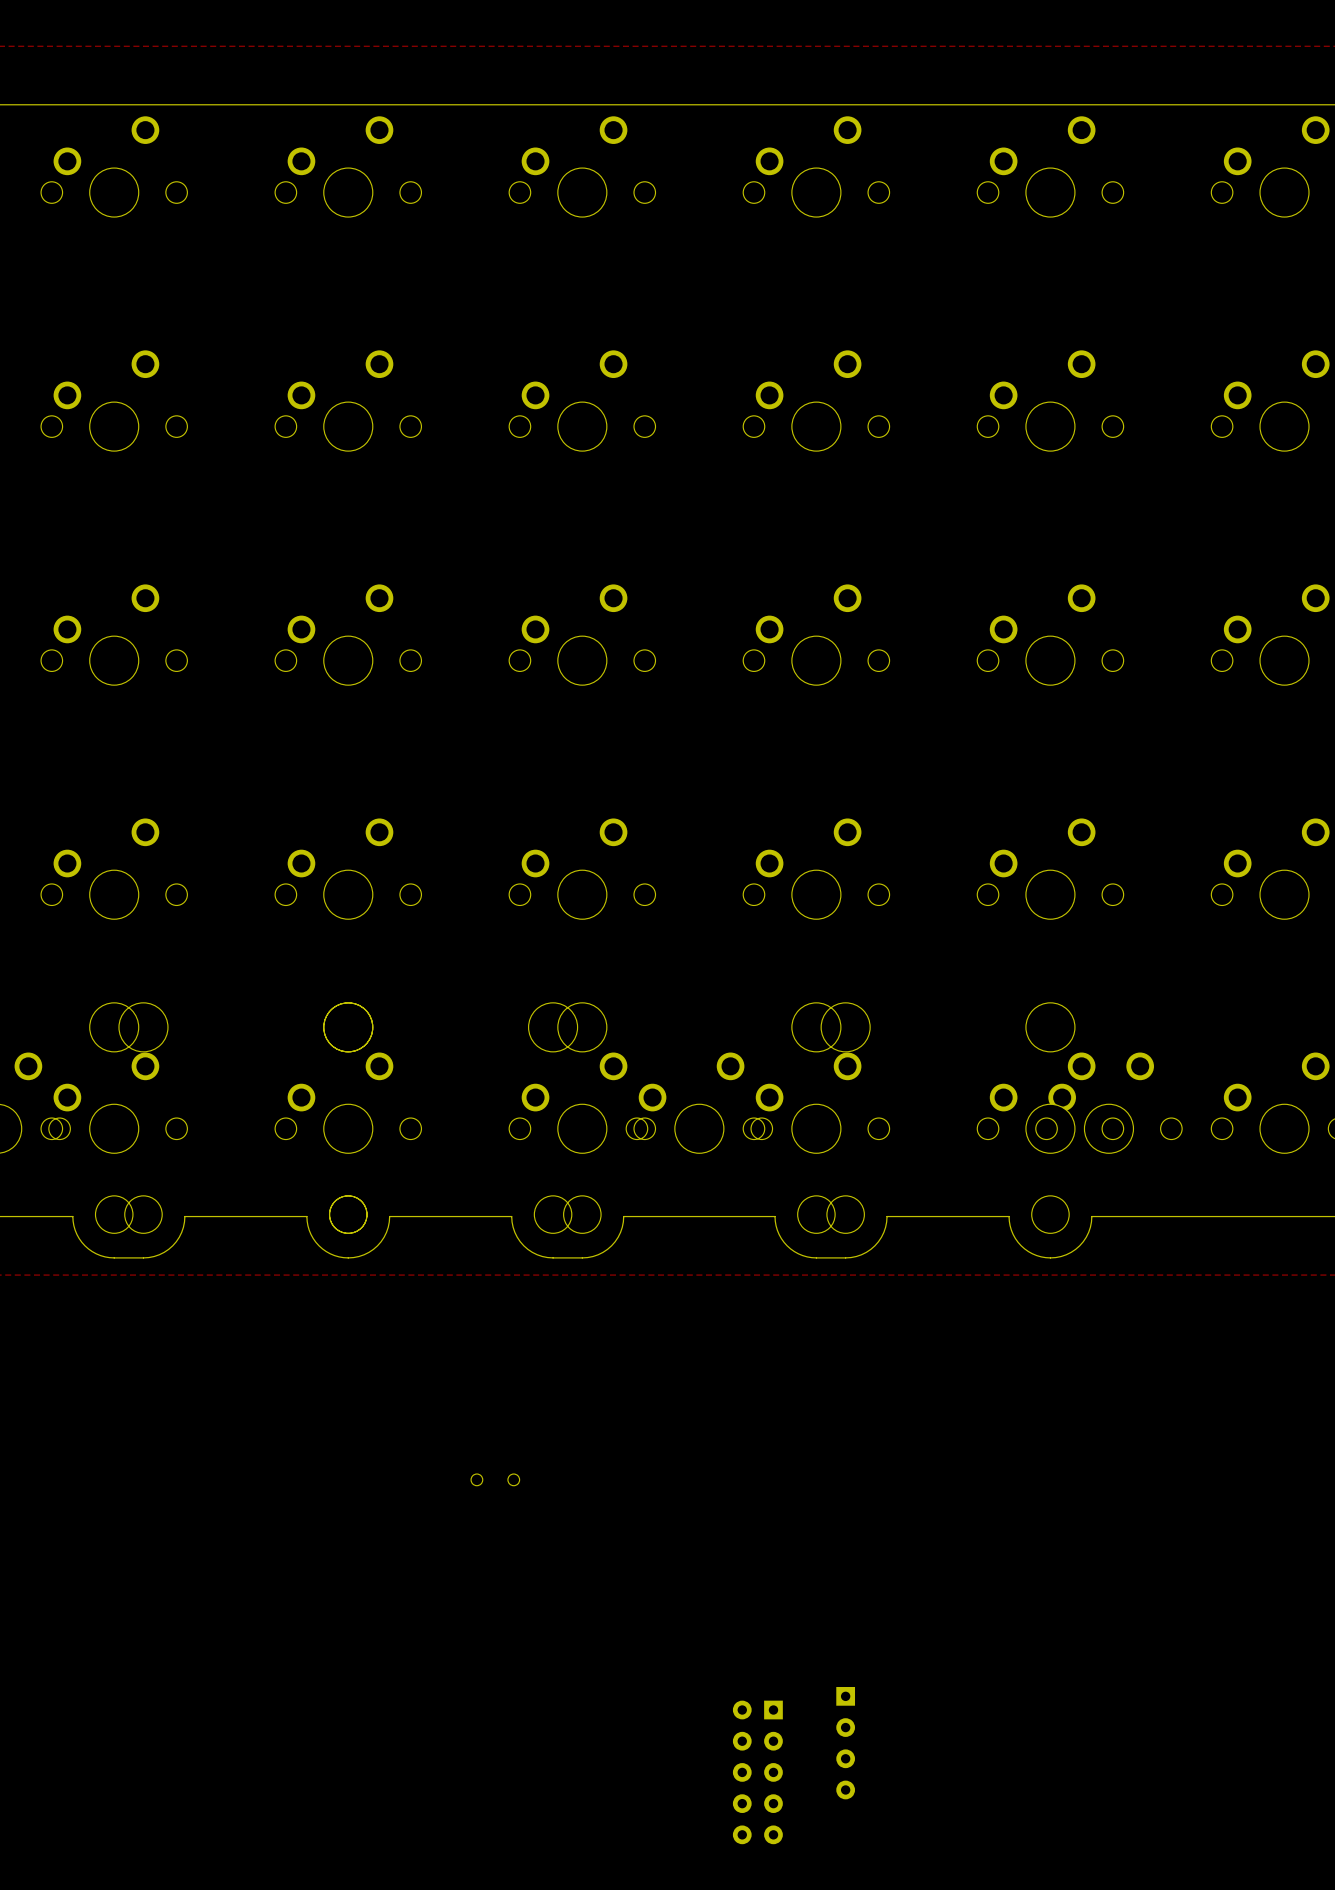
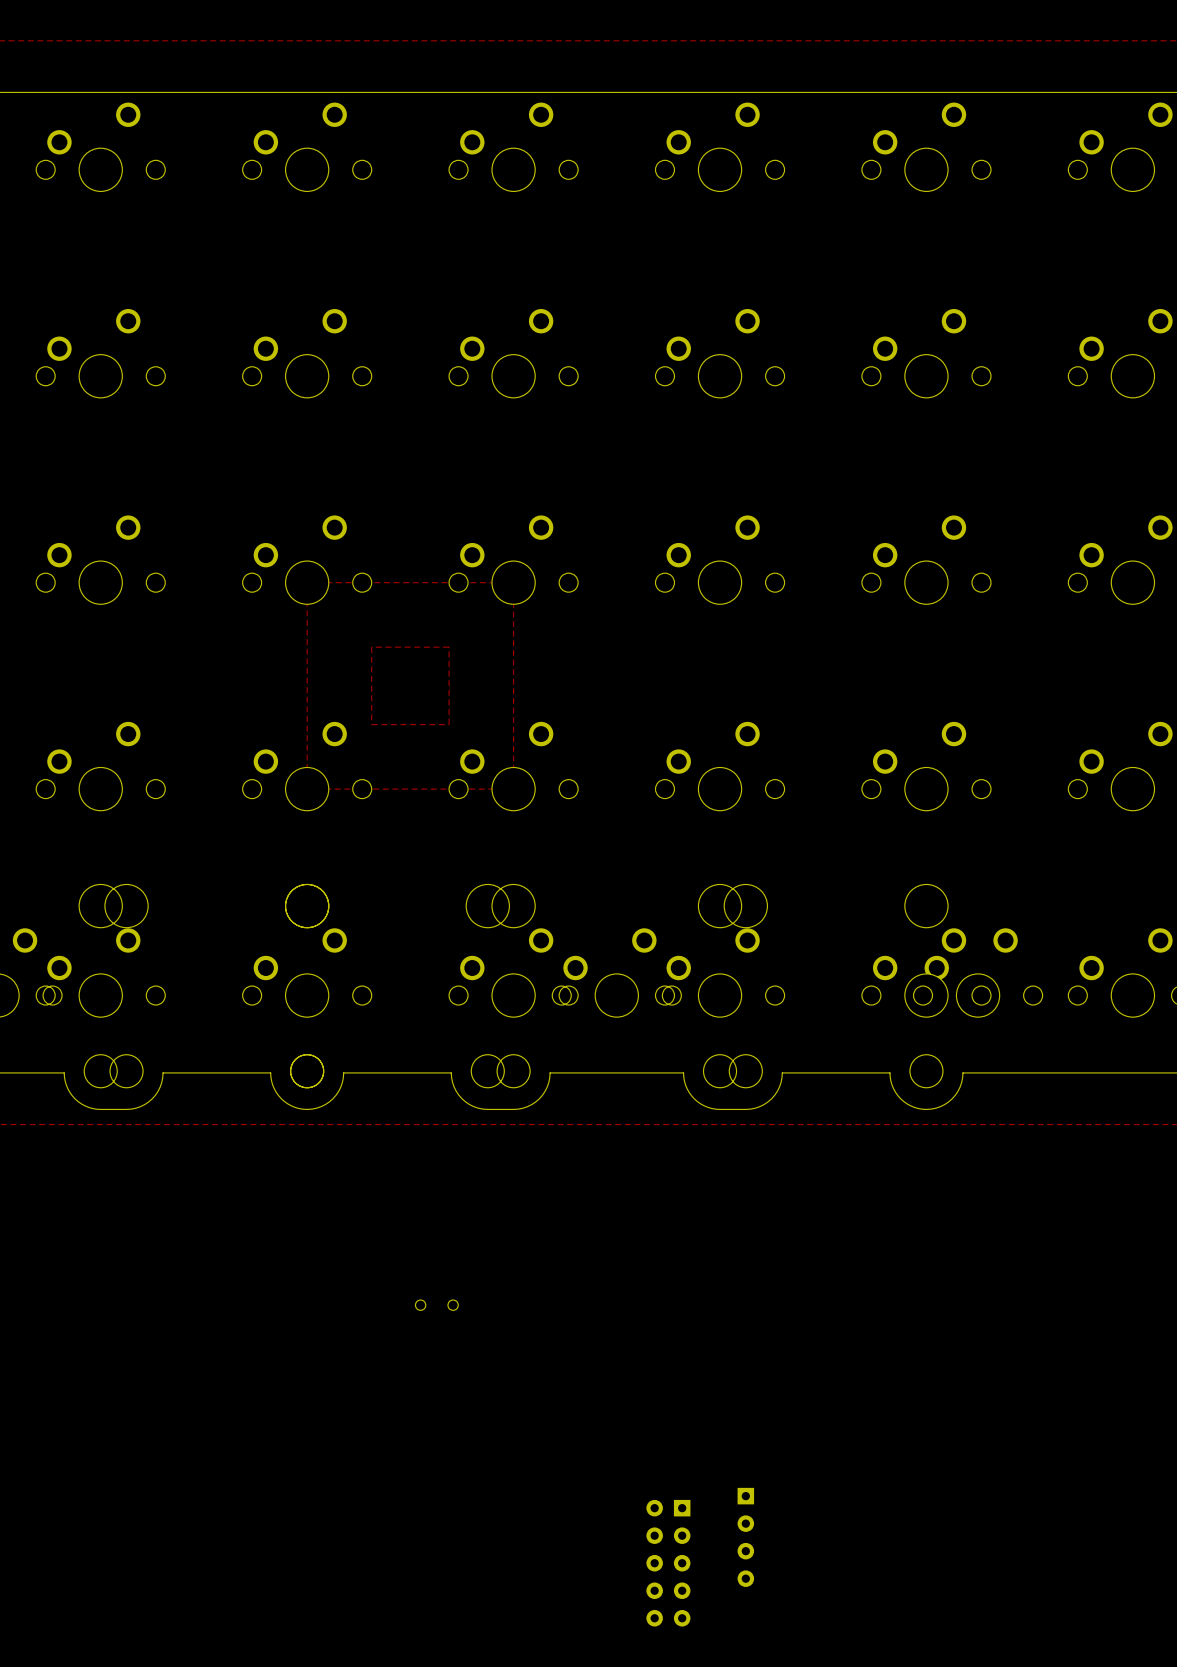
zone outline: none -> (307, 582) (307, 789) (513, 789) (513, 582) (307, 582)
zone outline: none -> (371, 647) (371, 724) (449, 724) (449, 647) (371, 647)

